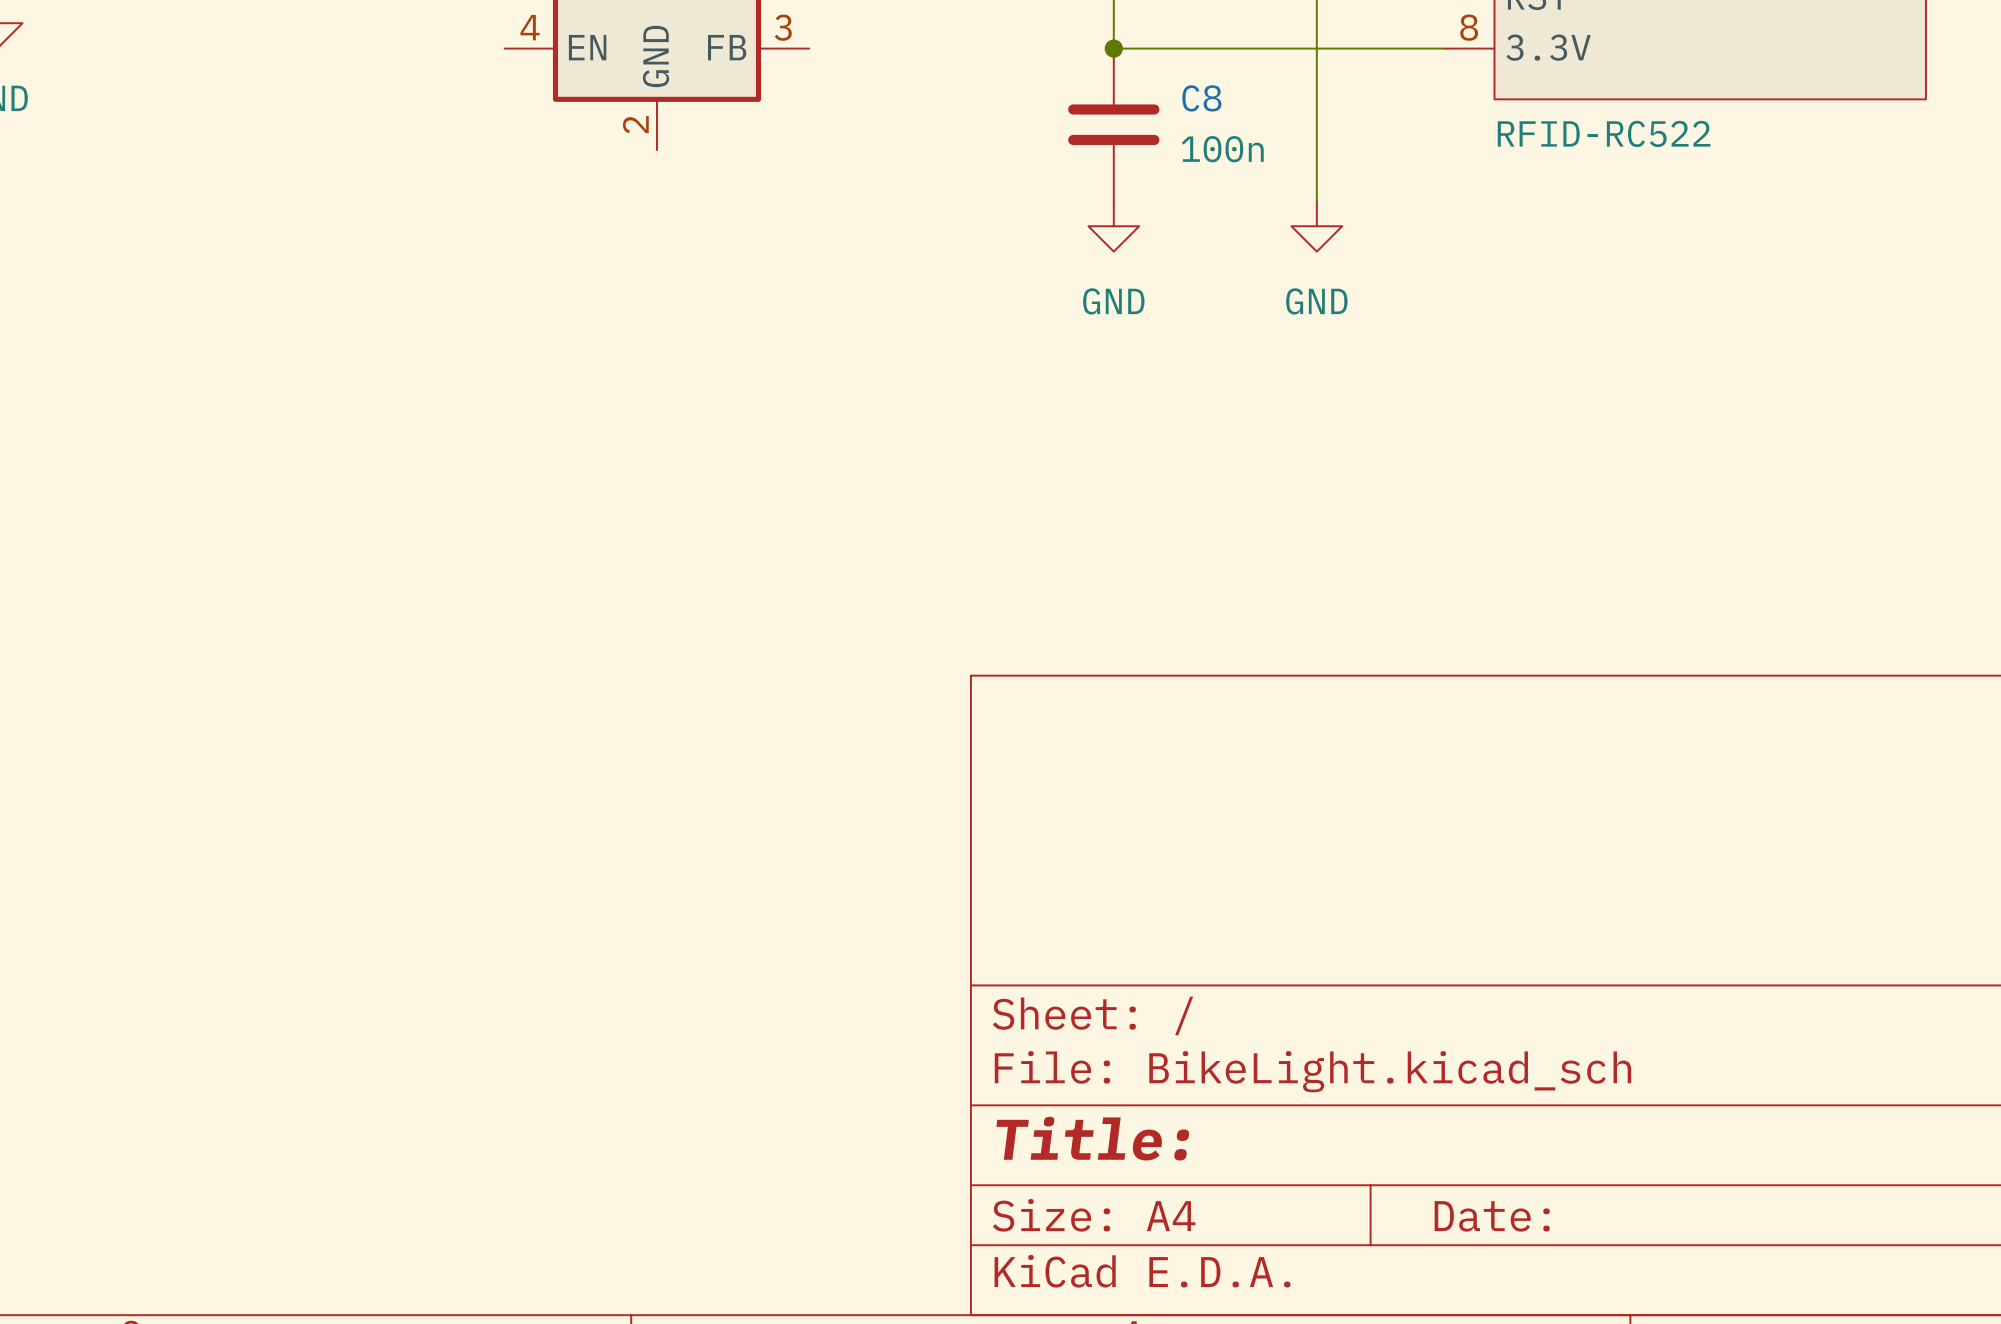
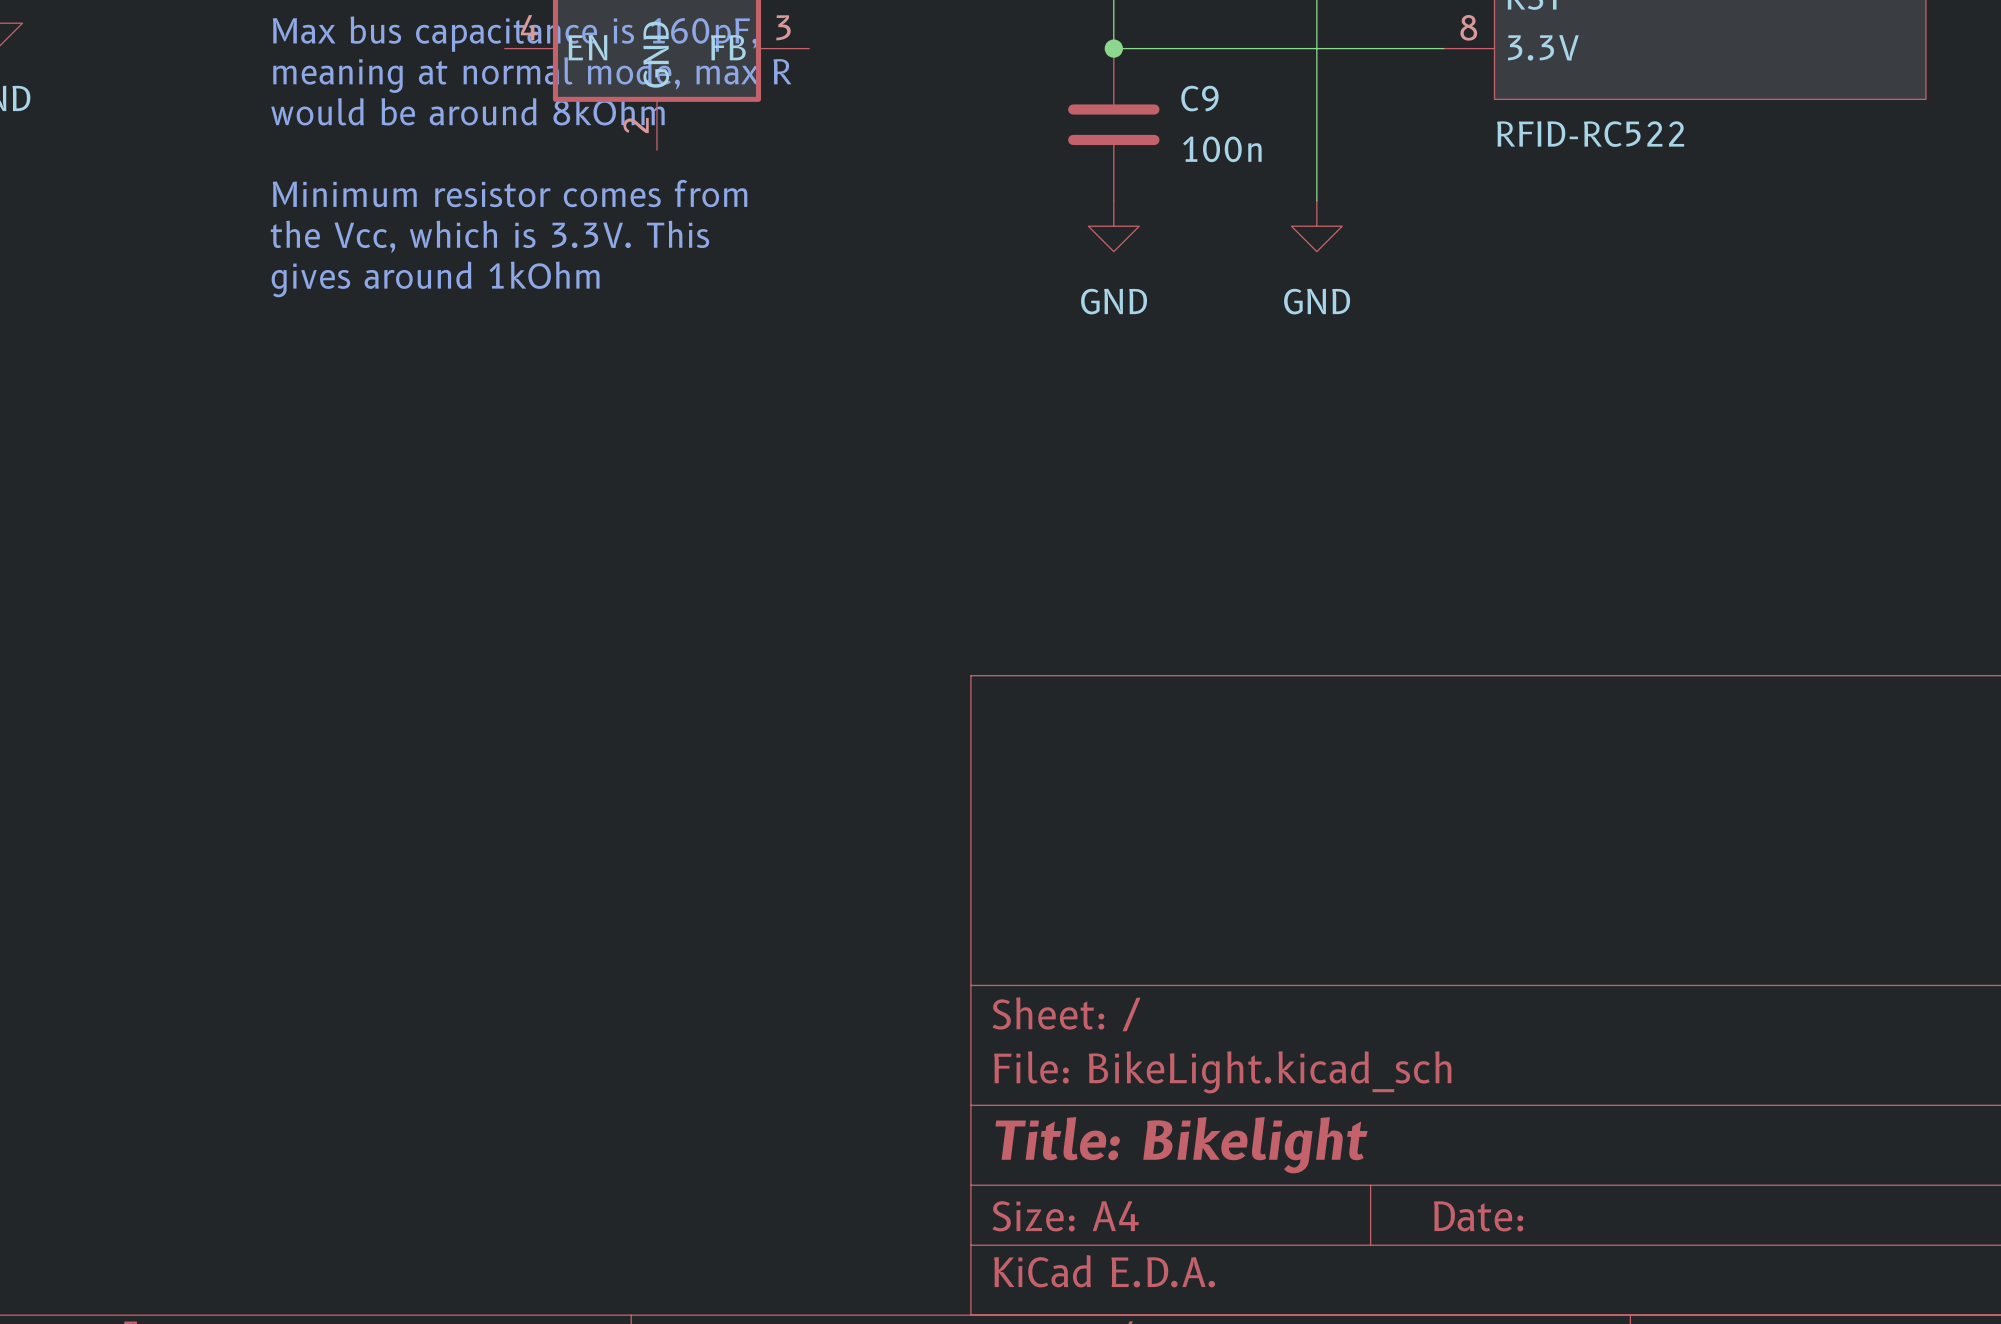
text: none -> Max bus capacitance is 160pF, (515, 34)
text: none -> meaning at normal mode, max R (532, 75)
C8 name: C8 (1201, 98) -> C9 (1199, 98)
text: none -> would be around 8kOhm (467, 111)
text: none -> Minimum resistor comes from (510, 193)
text: none -> the Vcc, which is 3.3V. This (489, 236)
text: none -> gives around 1kOhm (435, 279)
title block: Title: (1092, 1138) -> Title: Bikelight (1181, 1145)

